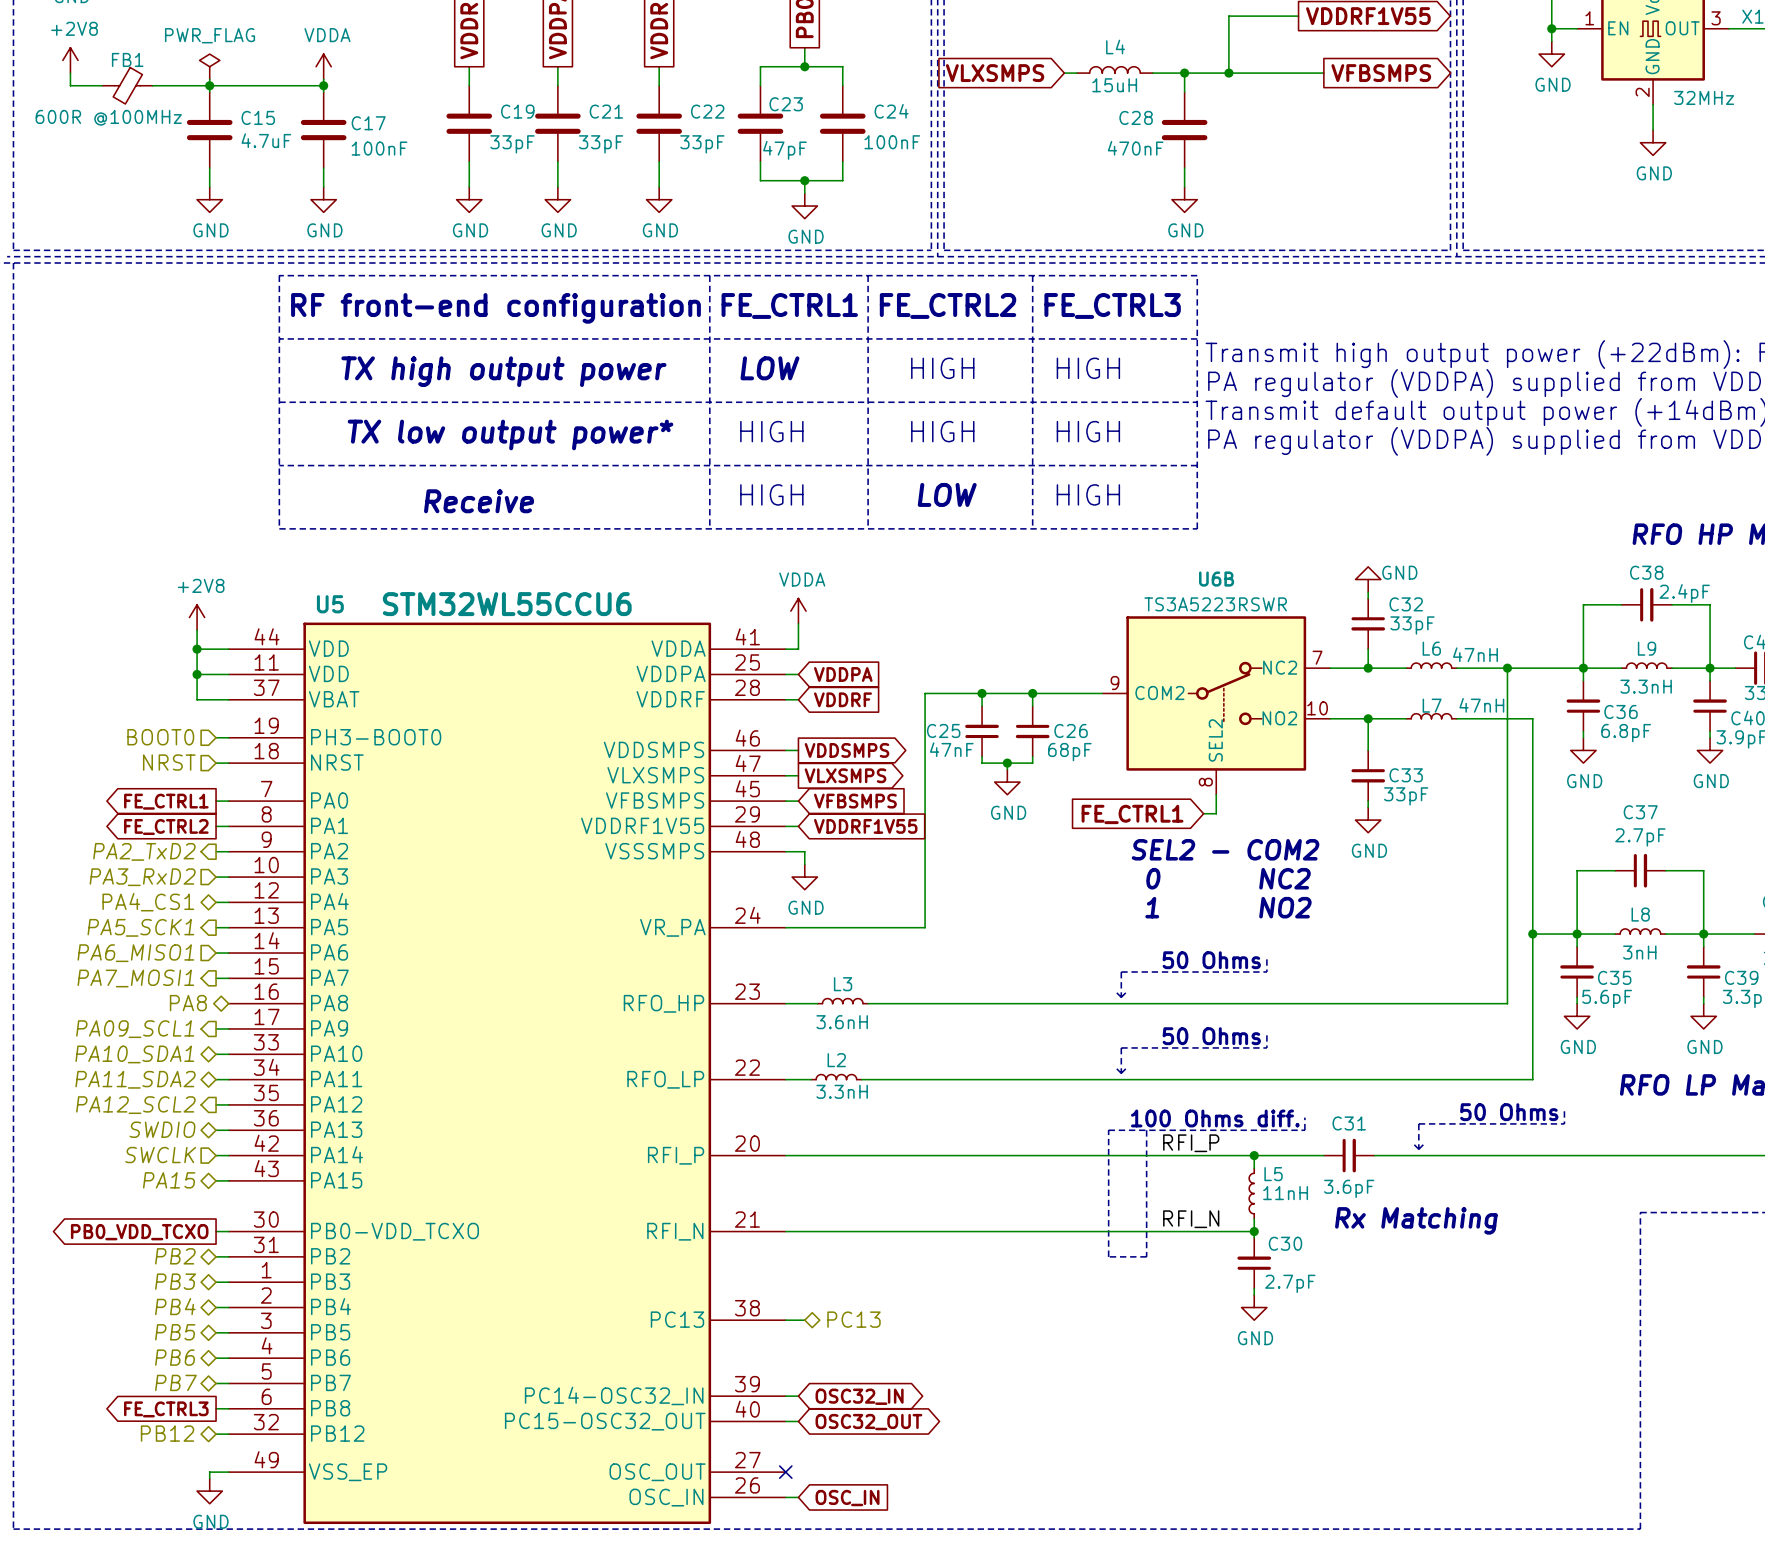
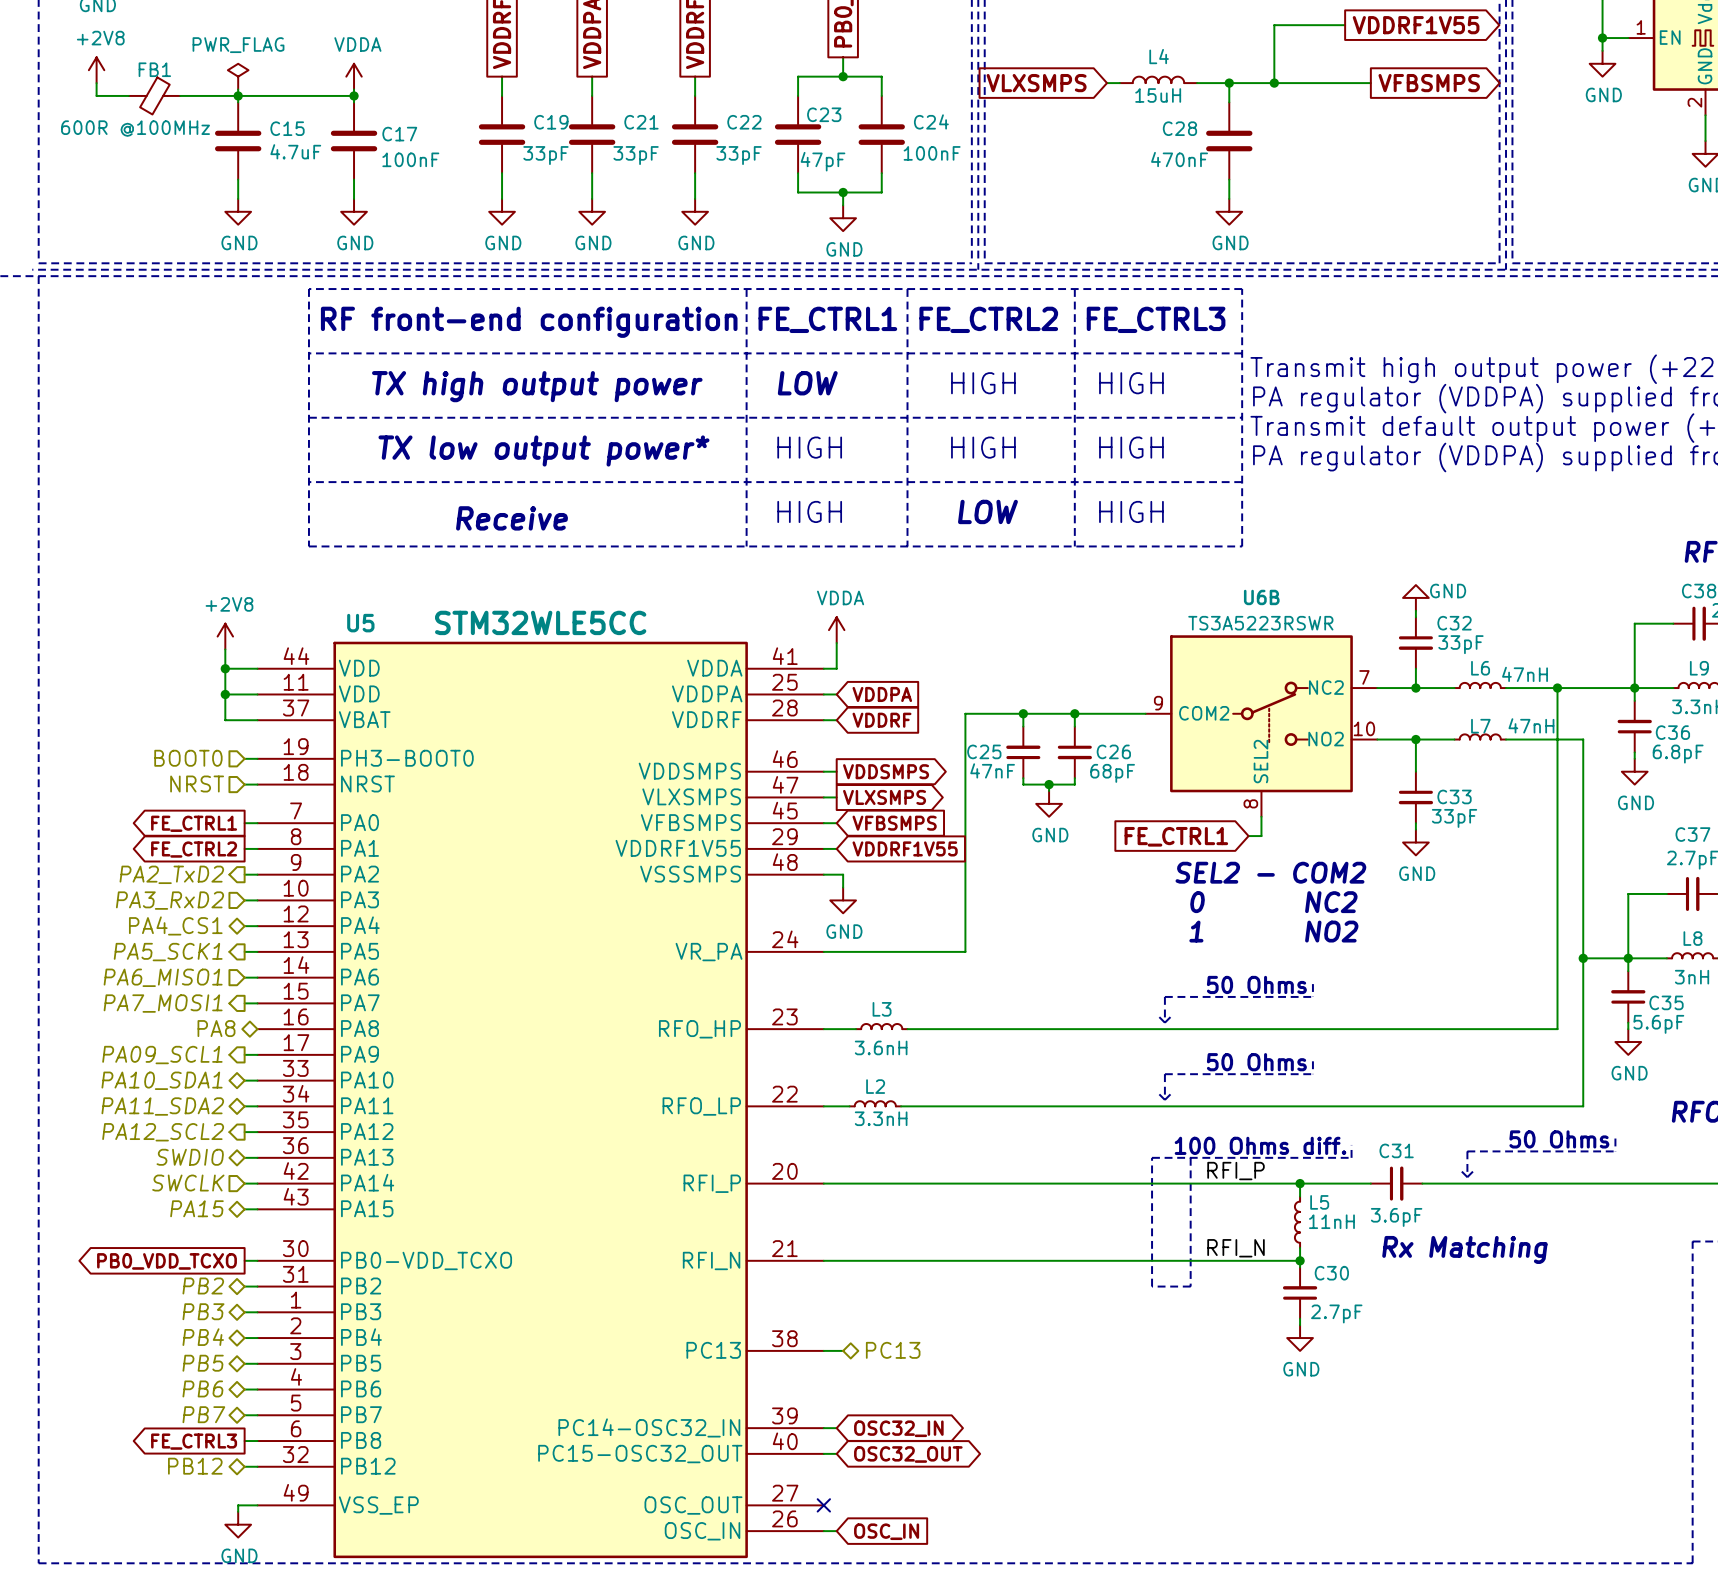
U5 value: STM32WL55CCU6 (507, 604) -> STM32WLE5CC (540, 622)

